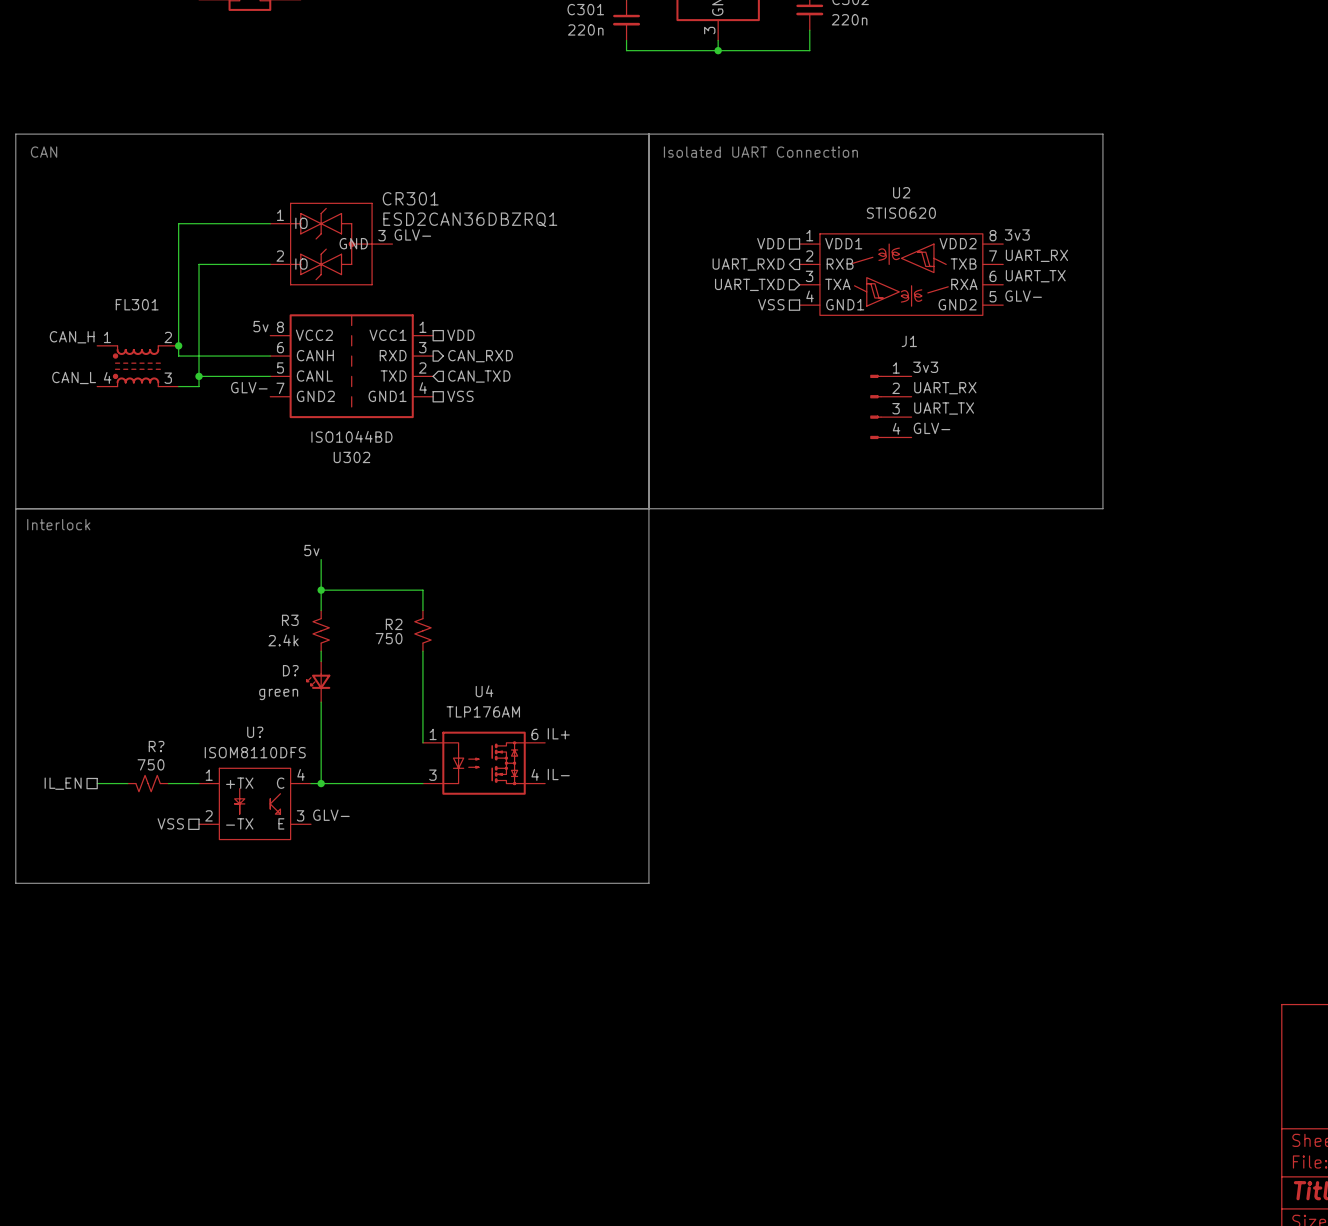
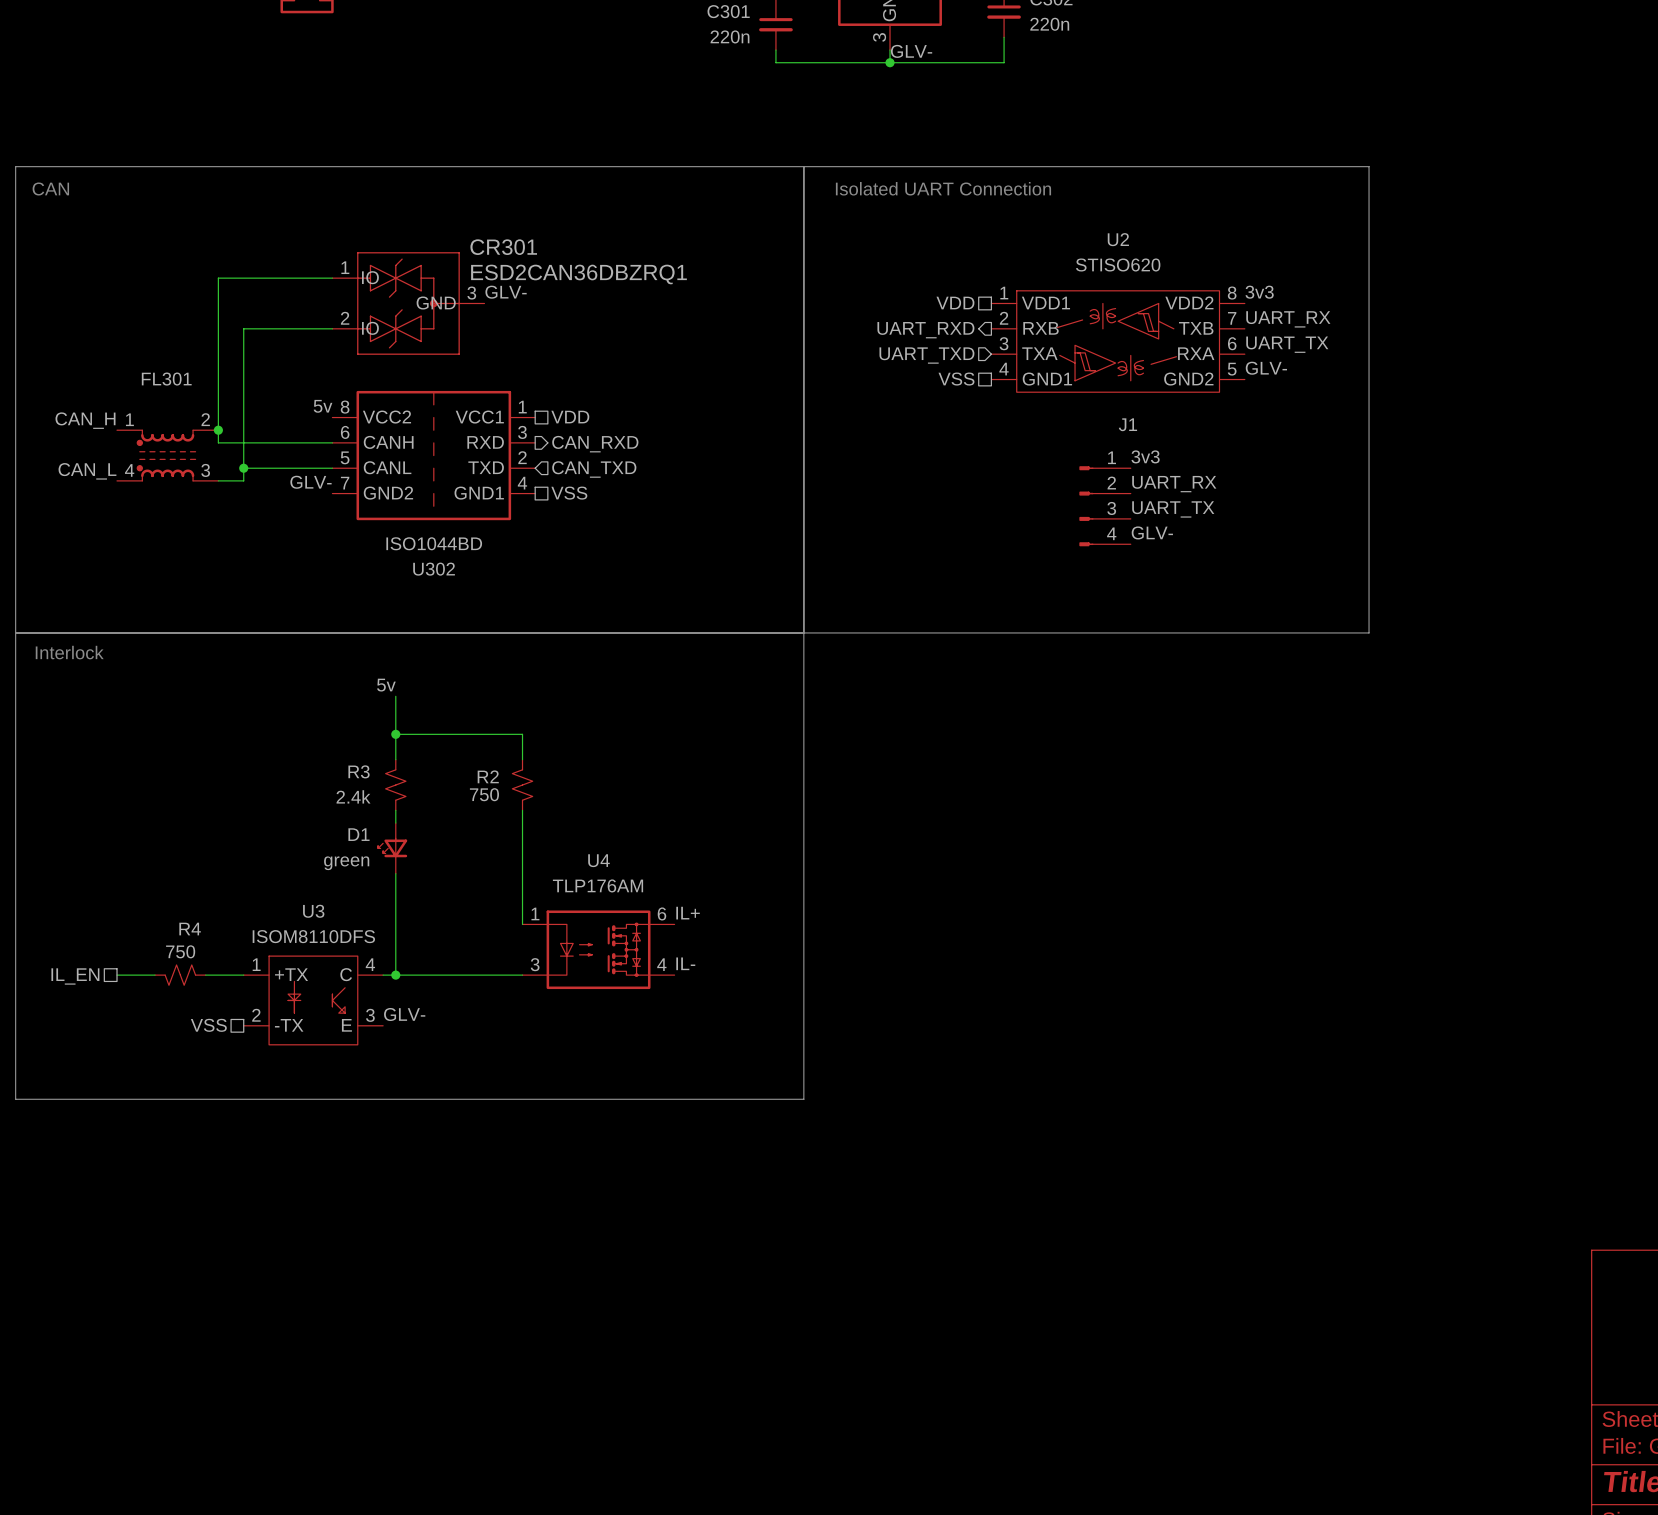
label: none -> GLV- (911, 51)
D? name: D? (290, 670) -> D1 (358, 834)
U? name: U? (255, 732) -> U3 (313, 911)
R? name: R? (156, 746) -> R4 (190, 929)

